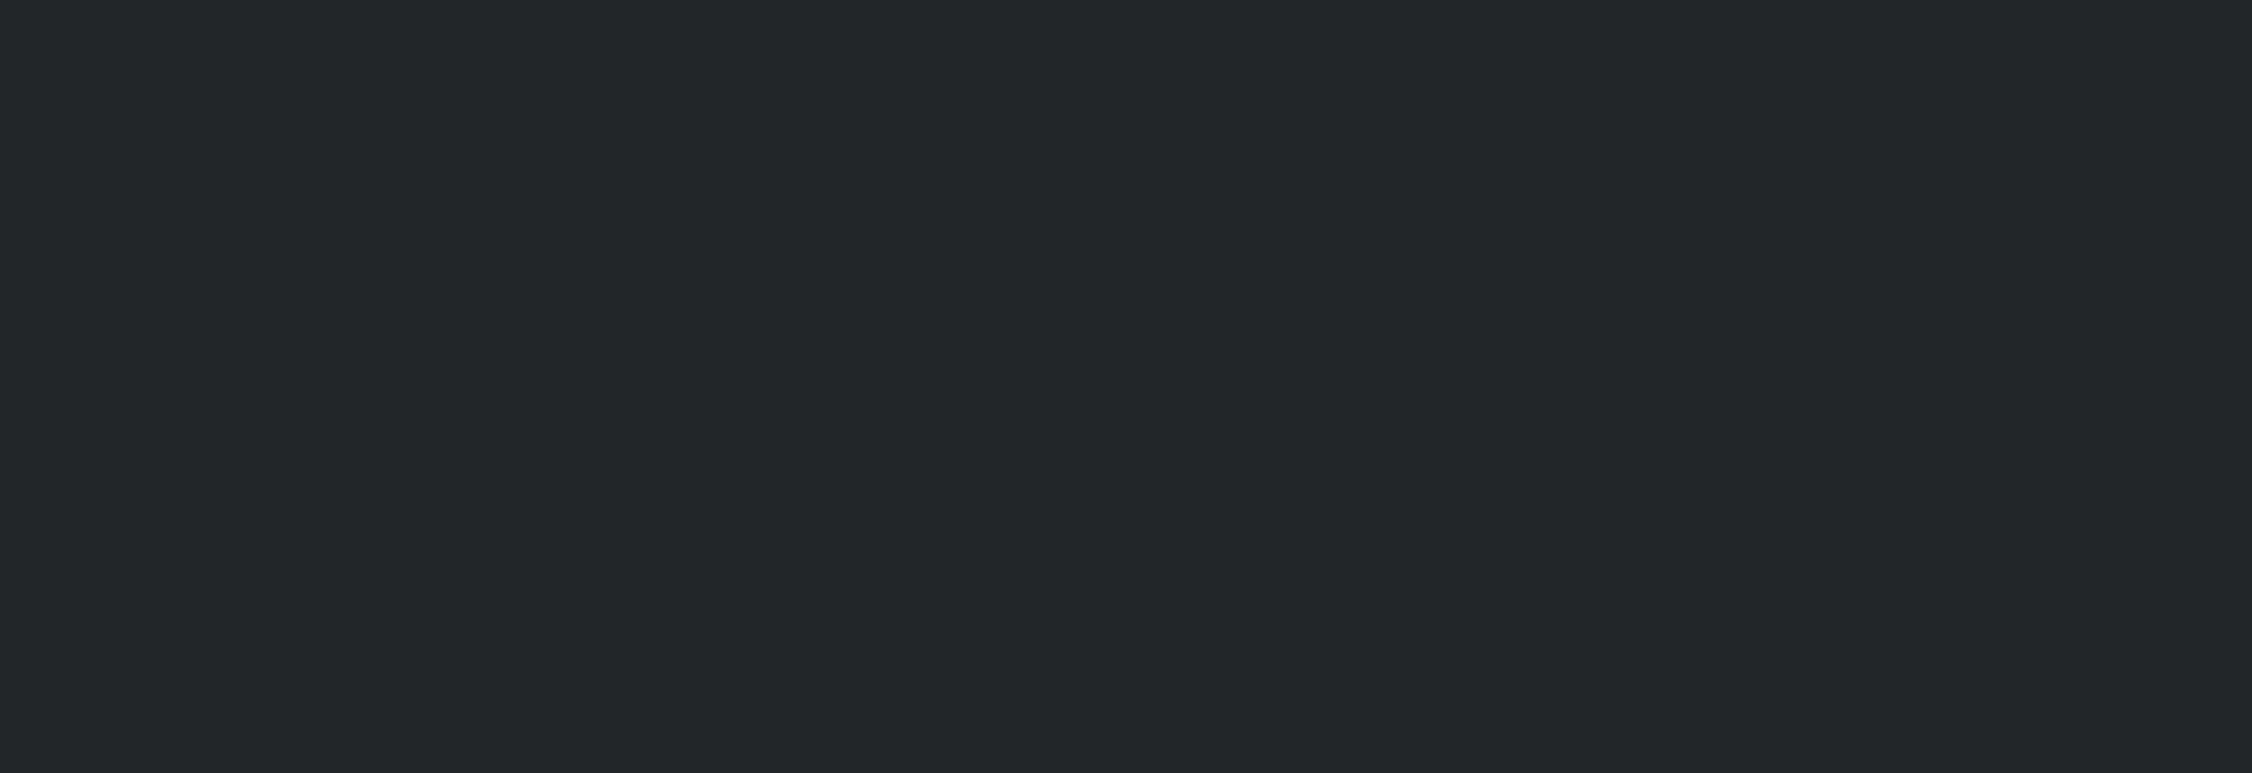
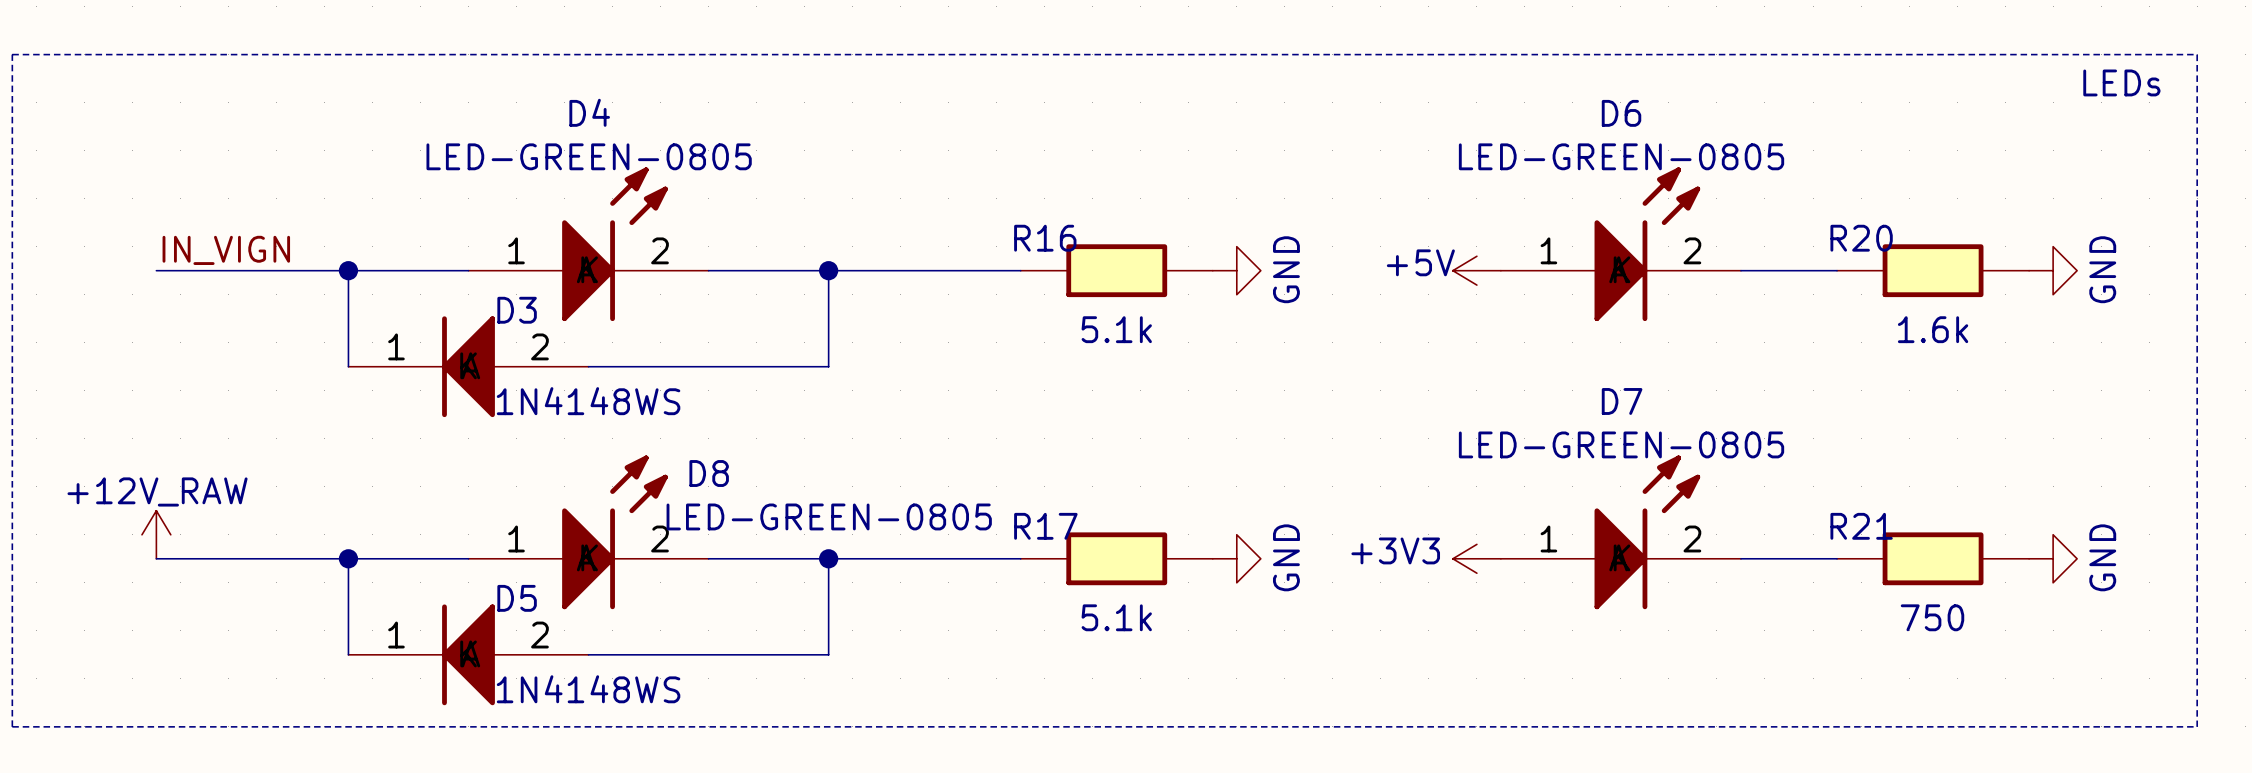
line: none -> (12, 54) (2197, 54) (2197, 726) (12, 726) (12, 54)
text: none -> LEDs (2121, 82)
D4: none -> LED-GREEN-0805 (588, 244)
D6: none -> LED-GREEN-0805 (1620, 244)
label: none -> IN_VIGN (226, 250)
wire: none -> (156, 270) (468, 270)
wire: none -> (348, 270) (348, 366)
junction: none -> (348, 270)
wire: none -> (708, 270) (1020, 270)
wire: none -> (828, 270) (828, 366) (588, 366)
junction: none -> (828, 270)
R16: none -> 5.1k (1116, 270)
power symbol: none -> GND (1236, 270)
power symbol: none -> +5V (1476, 270)
wire: none -> (1740, 270) (1837, 270)
R20: none -> 1.6k (1933, 270)
power symbol: none -> GND (2053, 270)
D3: none -> 1N4148WS (468, 366)
D8: none -> LED-GREEN-0805 (588, 532)
D7: none -> LED-GREEN-0805 (1620, 532)
power symbol: none -> +12V_RAW (156, 534)
wire: none -> (156, 558) (468, 558)
wire: none -> (348, 558) (348, 654)
junction: none -> (348, 558)
wire: none -> (708, 558) (1020, 558)
wire: none -> (828, 558) (828, 654) (588, 654)
junction: none -> (828, 558)
R17: none -> 5.1k (1116, 558)
power symbol: none -> GND (1236, 558)
power symbol: none -> +3V3 (1476, 558)
wire: none -> (1740, 558) (1837, 558)
R21: none -> 750 (1933, 558)
power symbol: none -> GND (2053, 558)
D5: none -> 1N4148WS (468, 654)

